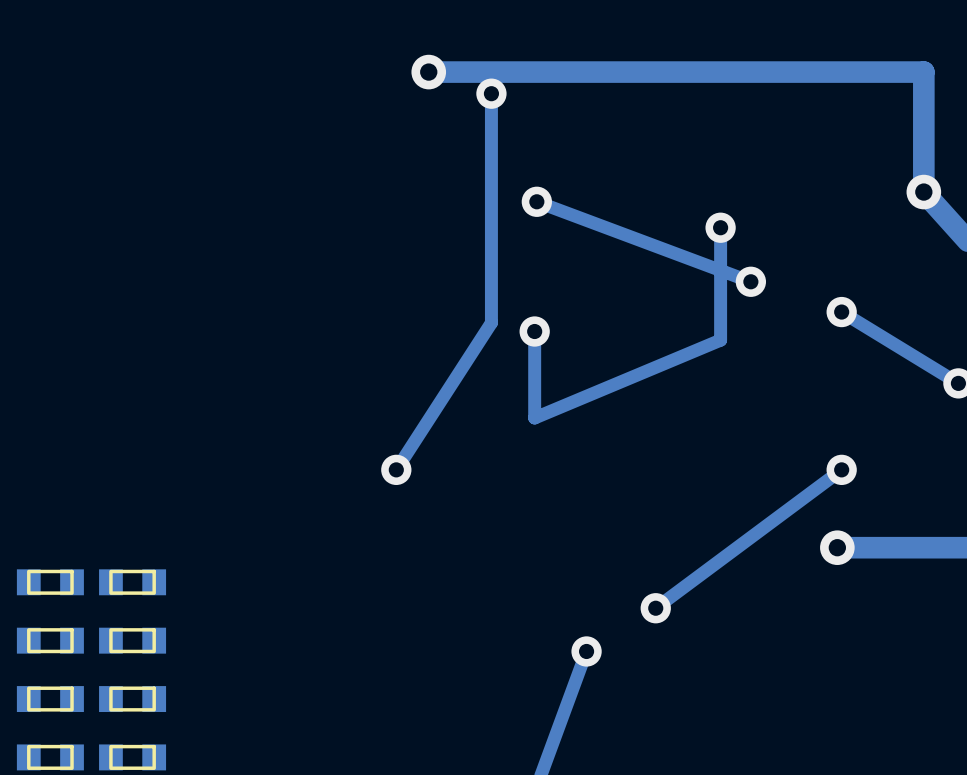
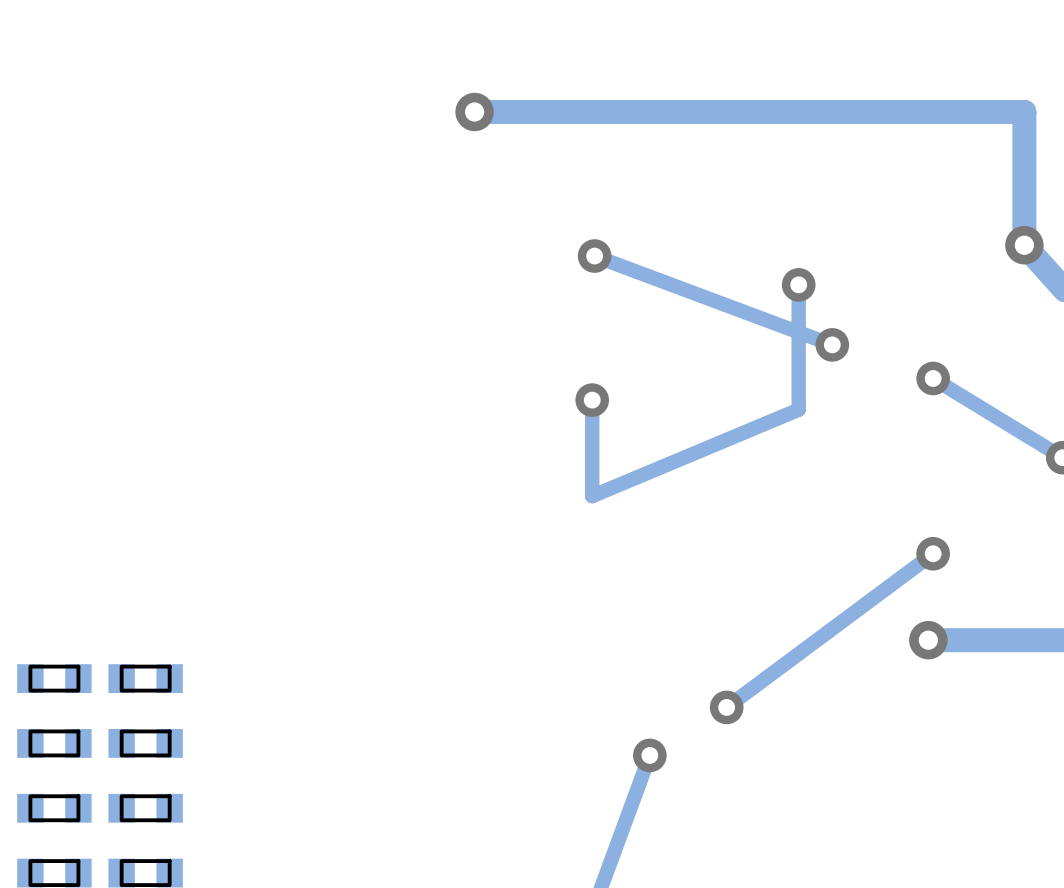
track: (491, 93) (491, 322) (396, 469) -> none
via: (491, 93) -> none
via: (396, 469) -> none

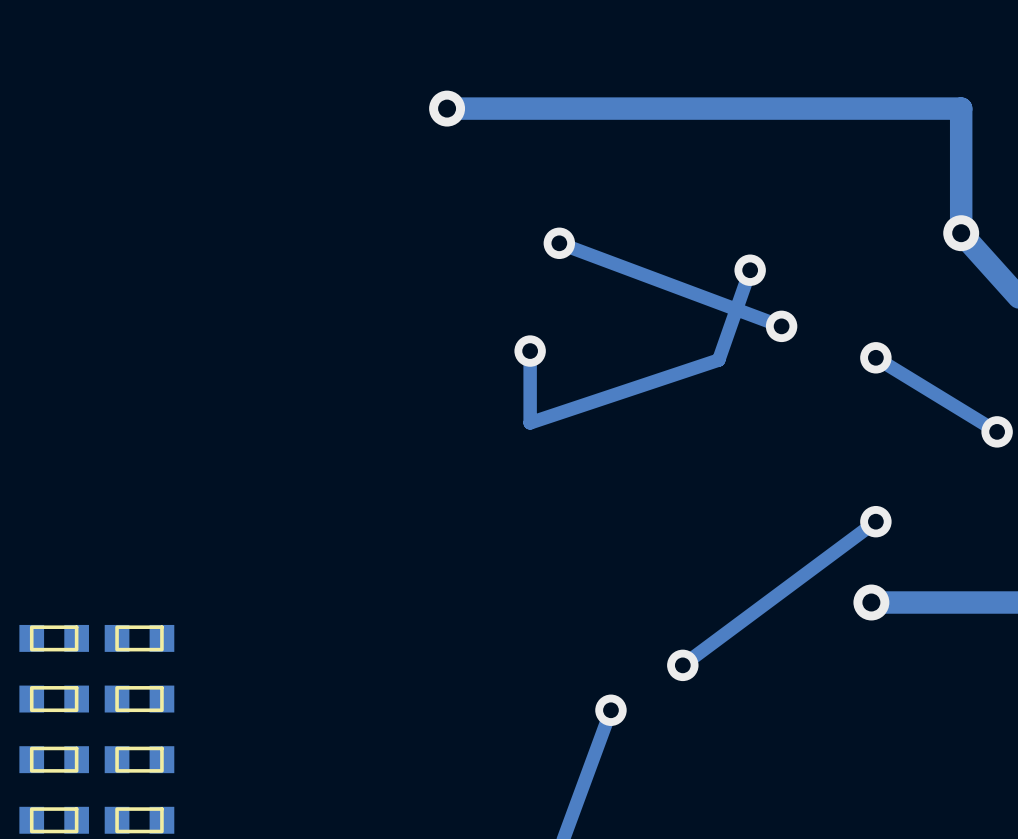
track: (798, 284) (798, 409) (592, 496) (592, 400) -> (750, 270) (718, 360) (530, 422) (530, 351)
via position: (592, 400) -> (530, 351)

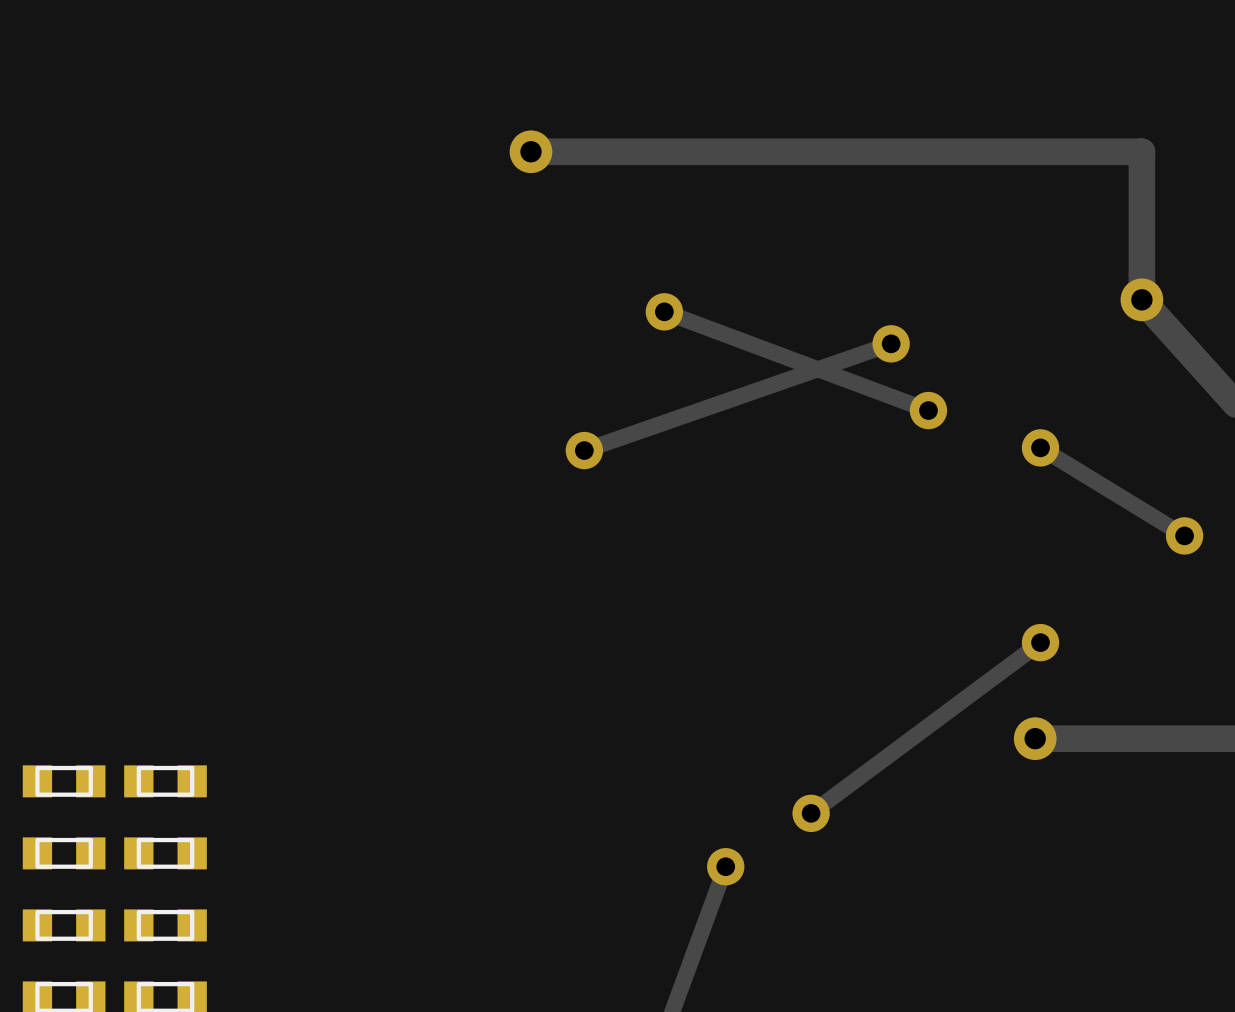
track: (750, 270) (718, 360) (530, 422) (530, 351) -> (891, 343) (584, 450)
via position: (530, 351) -> (584, 450)

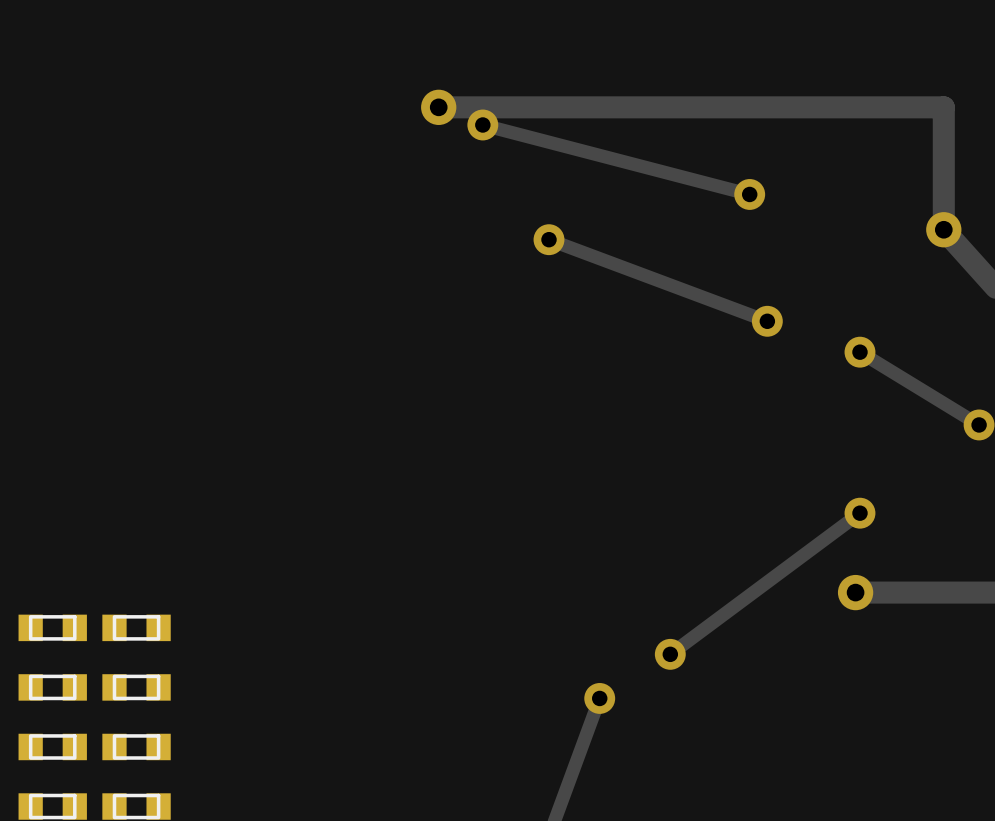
track: none -> (482, 124) (749, 194)
via: none -> (482, 124)
track: (891, 343) (584, 450) -> none
via position: (891, 343) -> (749, 194)
via: (584, 450) -> none

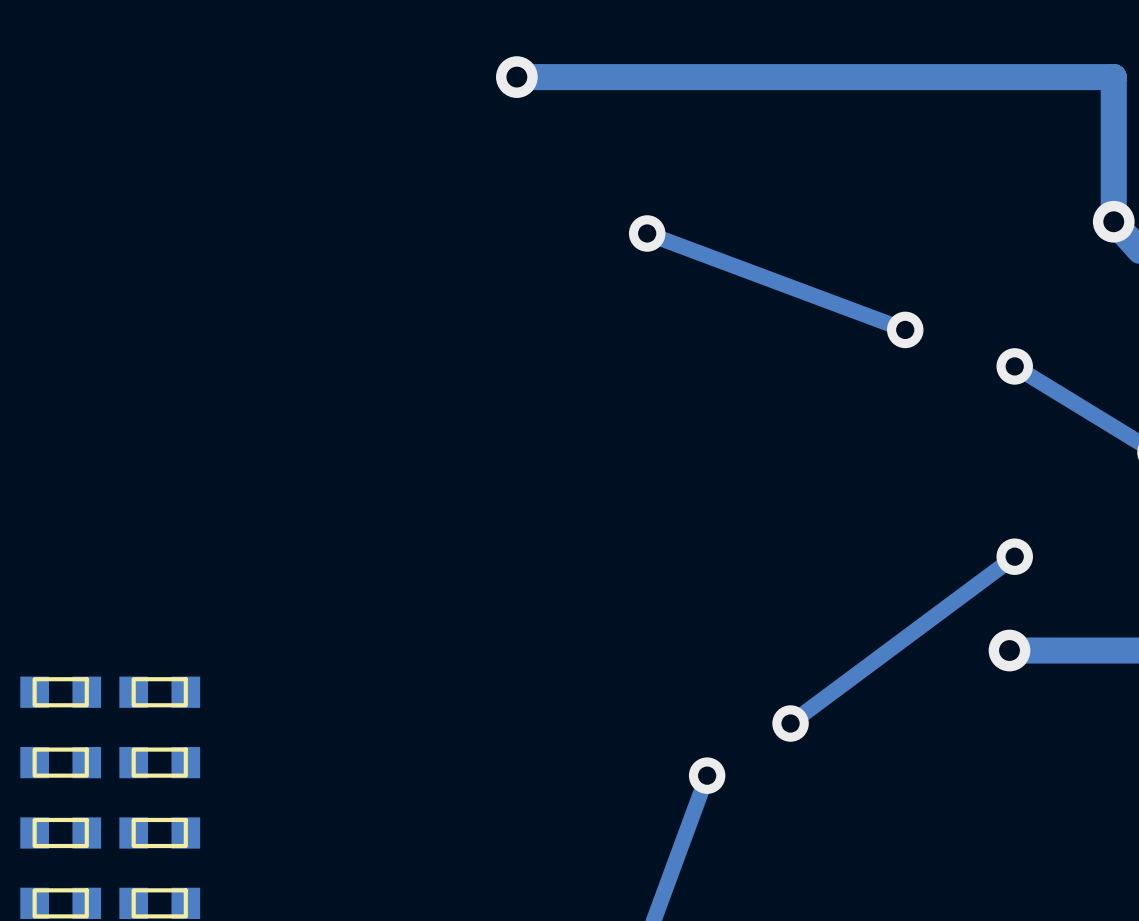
track: (482, 124) (749, 194) -> none
via: (482, 124) -> none
via: (749, 194) -> none

